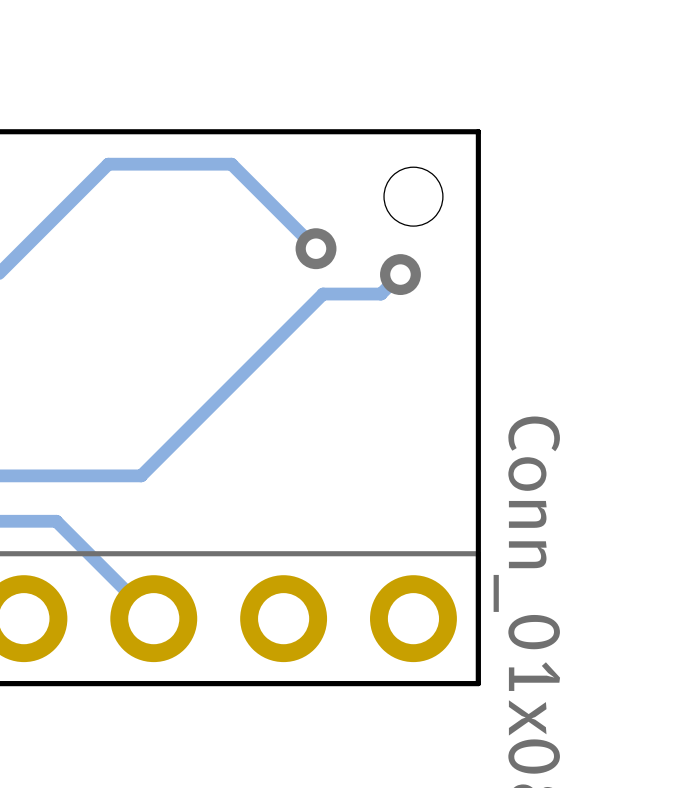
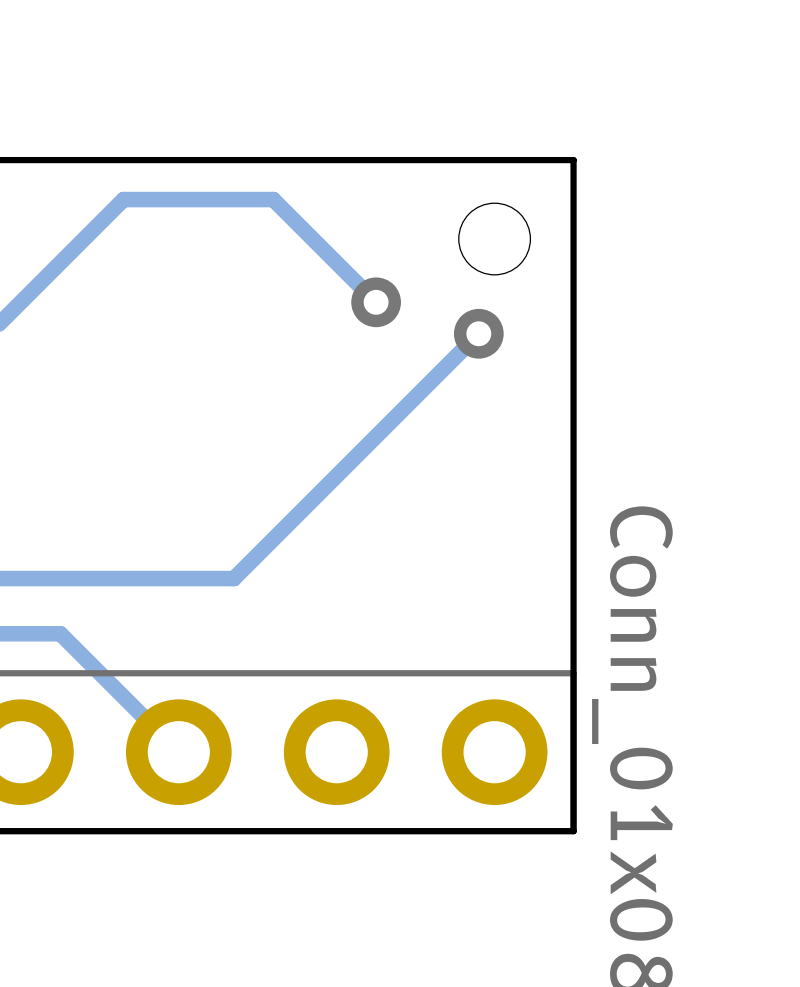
track: (381, 294) (323, 294) (141, 475) -> (455, 357) (234, 578) (163, 578)

